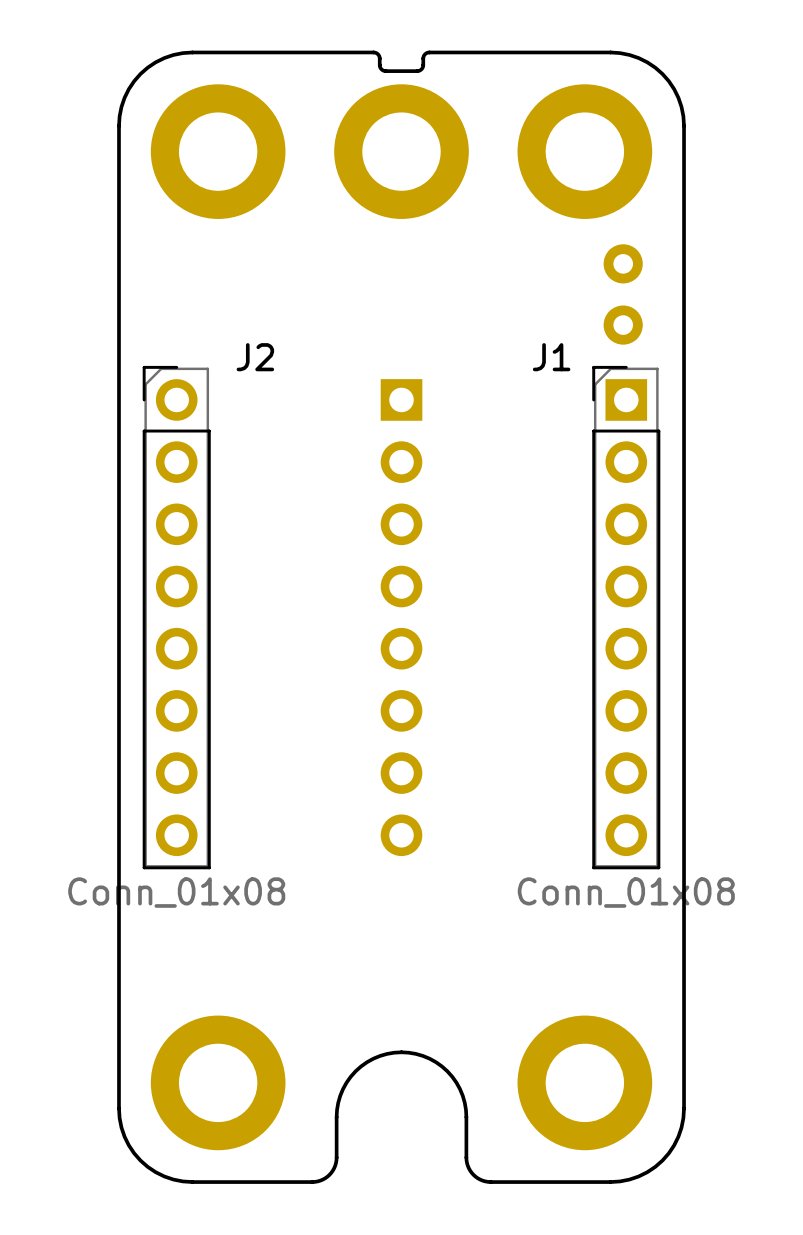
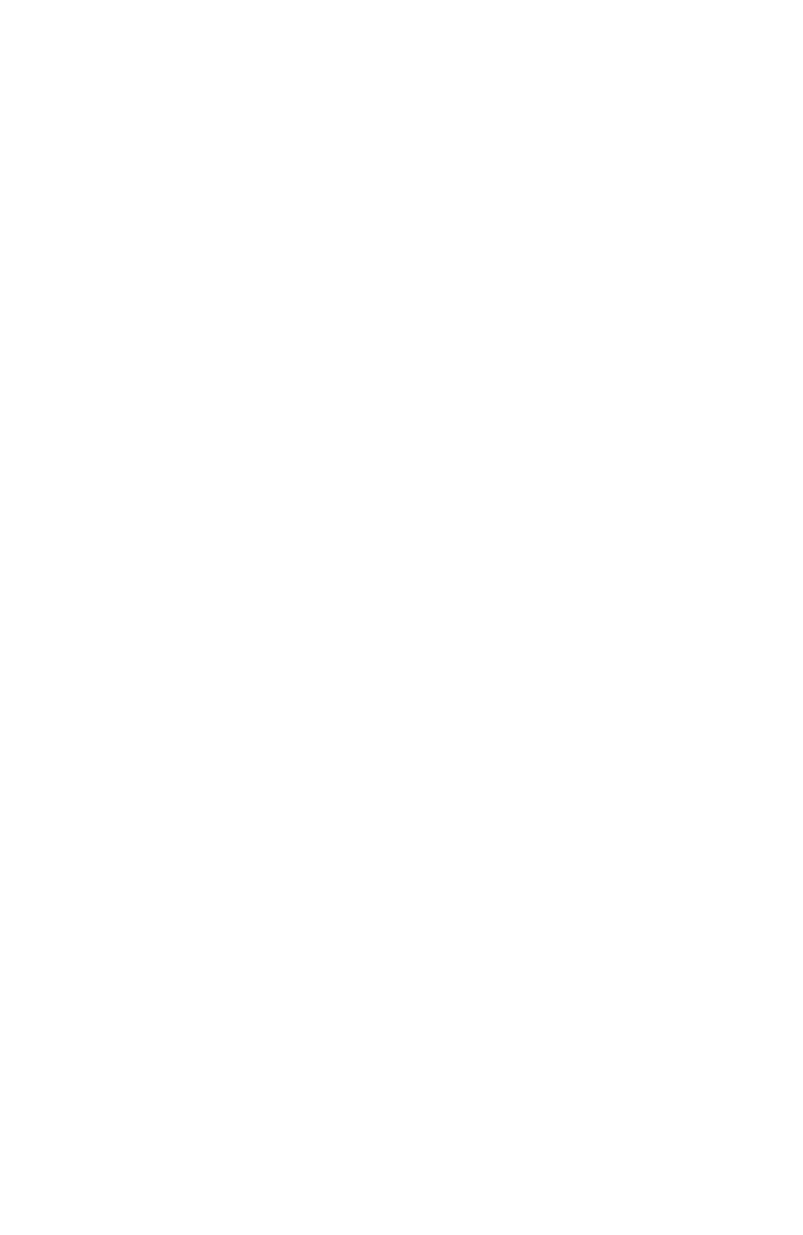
board edge: (610, 52) (428, 52) (423, 56) (422, 68) (417, 71) (383, 70) (379, 66) (379, 55) (374, 52) (182, 53) (164, 58) (147, 67) (134, 81) (124, 97) (118, 125) (118, 1108) (121, 1127) (128, 1145) (147, 1166) (164, 1176) (192, 1182) (312, 1182) (322, 1179) (331, 1172) (336, 1163) (337, 1109) (340, 1095) (346, 1082) (355, 1071) (366, 1062) (380, 1055) (394, 1052) (415, 1053) (429, 1058) (441, 1066) (456, 1082) (462, 1095) (465, 1109) (467, 1163) (471, 1172) (482, 1180) (610, 1182) (629, 1179) (655, 1166) (668, 1153) (678, 1136) (684, 1108) (684, 125) (678, 97) (662, 73) (638, 58) (610, 52) -> none
part: (218, 151) -> none
part: (401, 151) -> none
part: (584, 151) -> none
part: (623, 294) -> none
J2: Conn_01x08 (176, 617) -> none
part: (401, 617) -> none
J1: Conn_01x08 (626, 617) -> none
part: (218, 1082) -> none
part: (584, 1082) -> none

